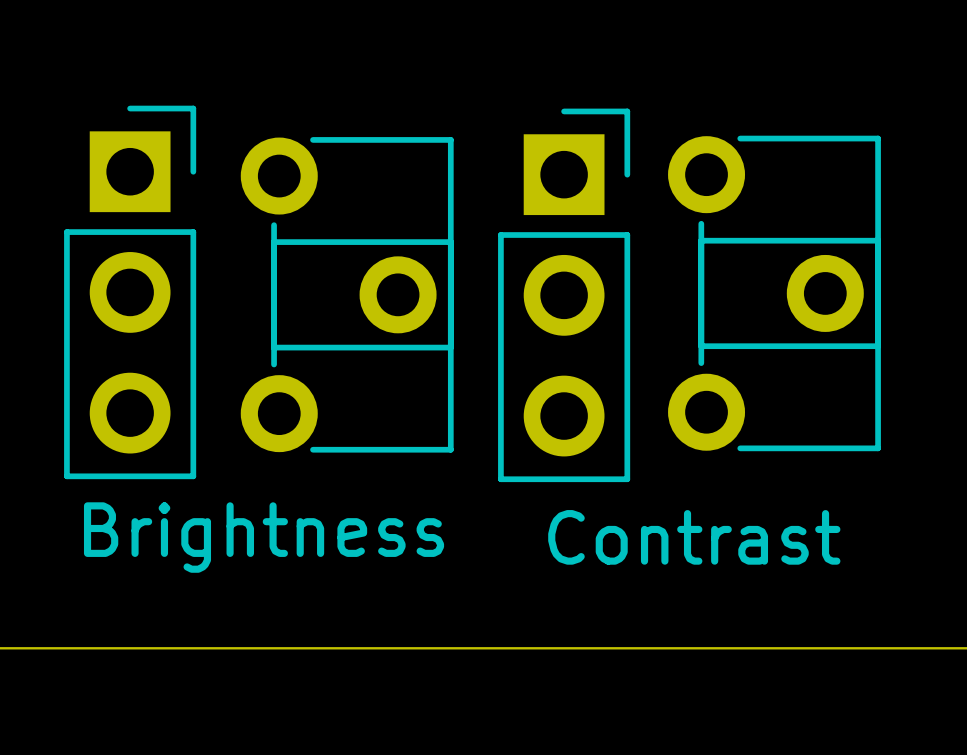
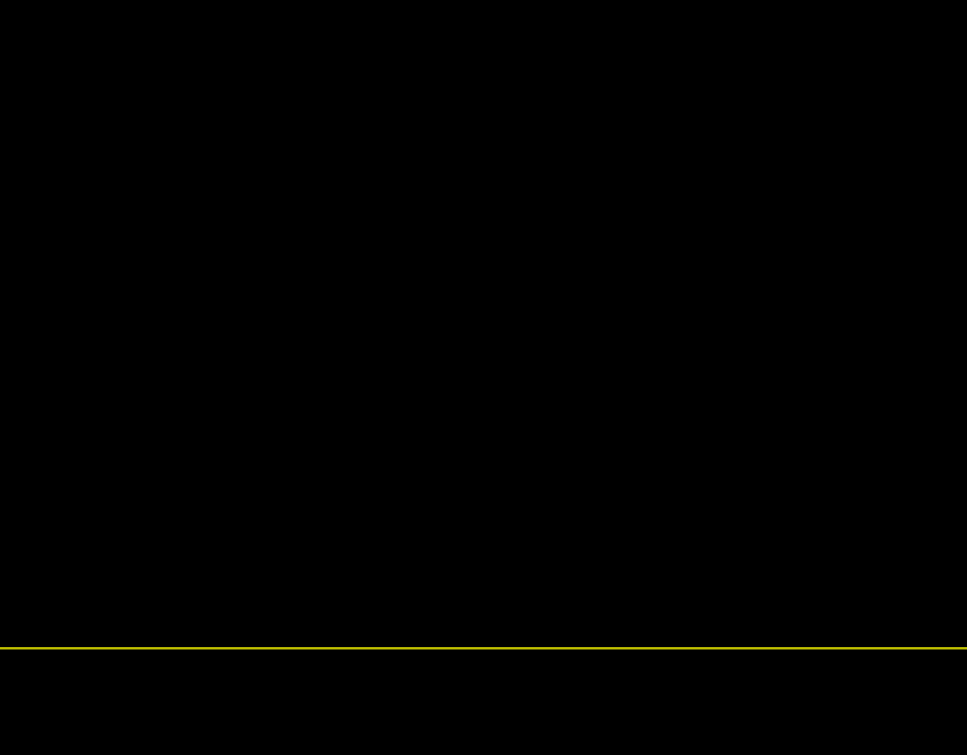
part: (130, 292) -> none
part: Contrast (774, 293) -> none
part: Brightness (347, 294) -> none
part: (564, 295) -> none

